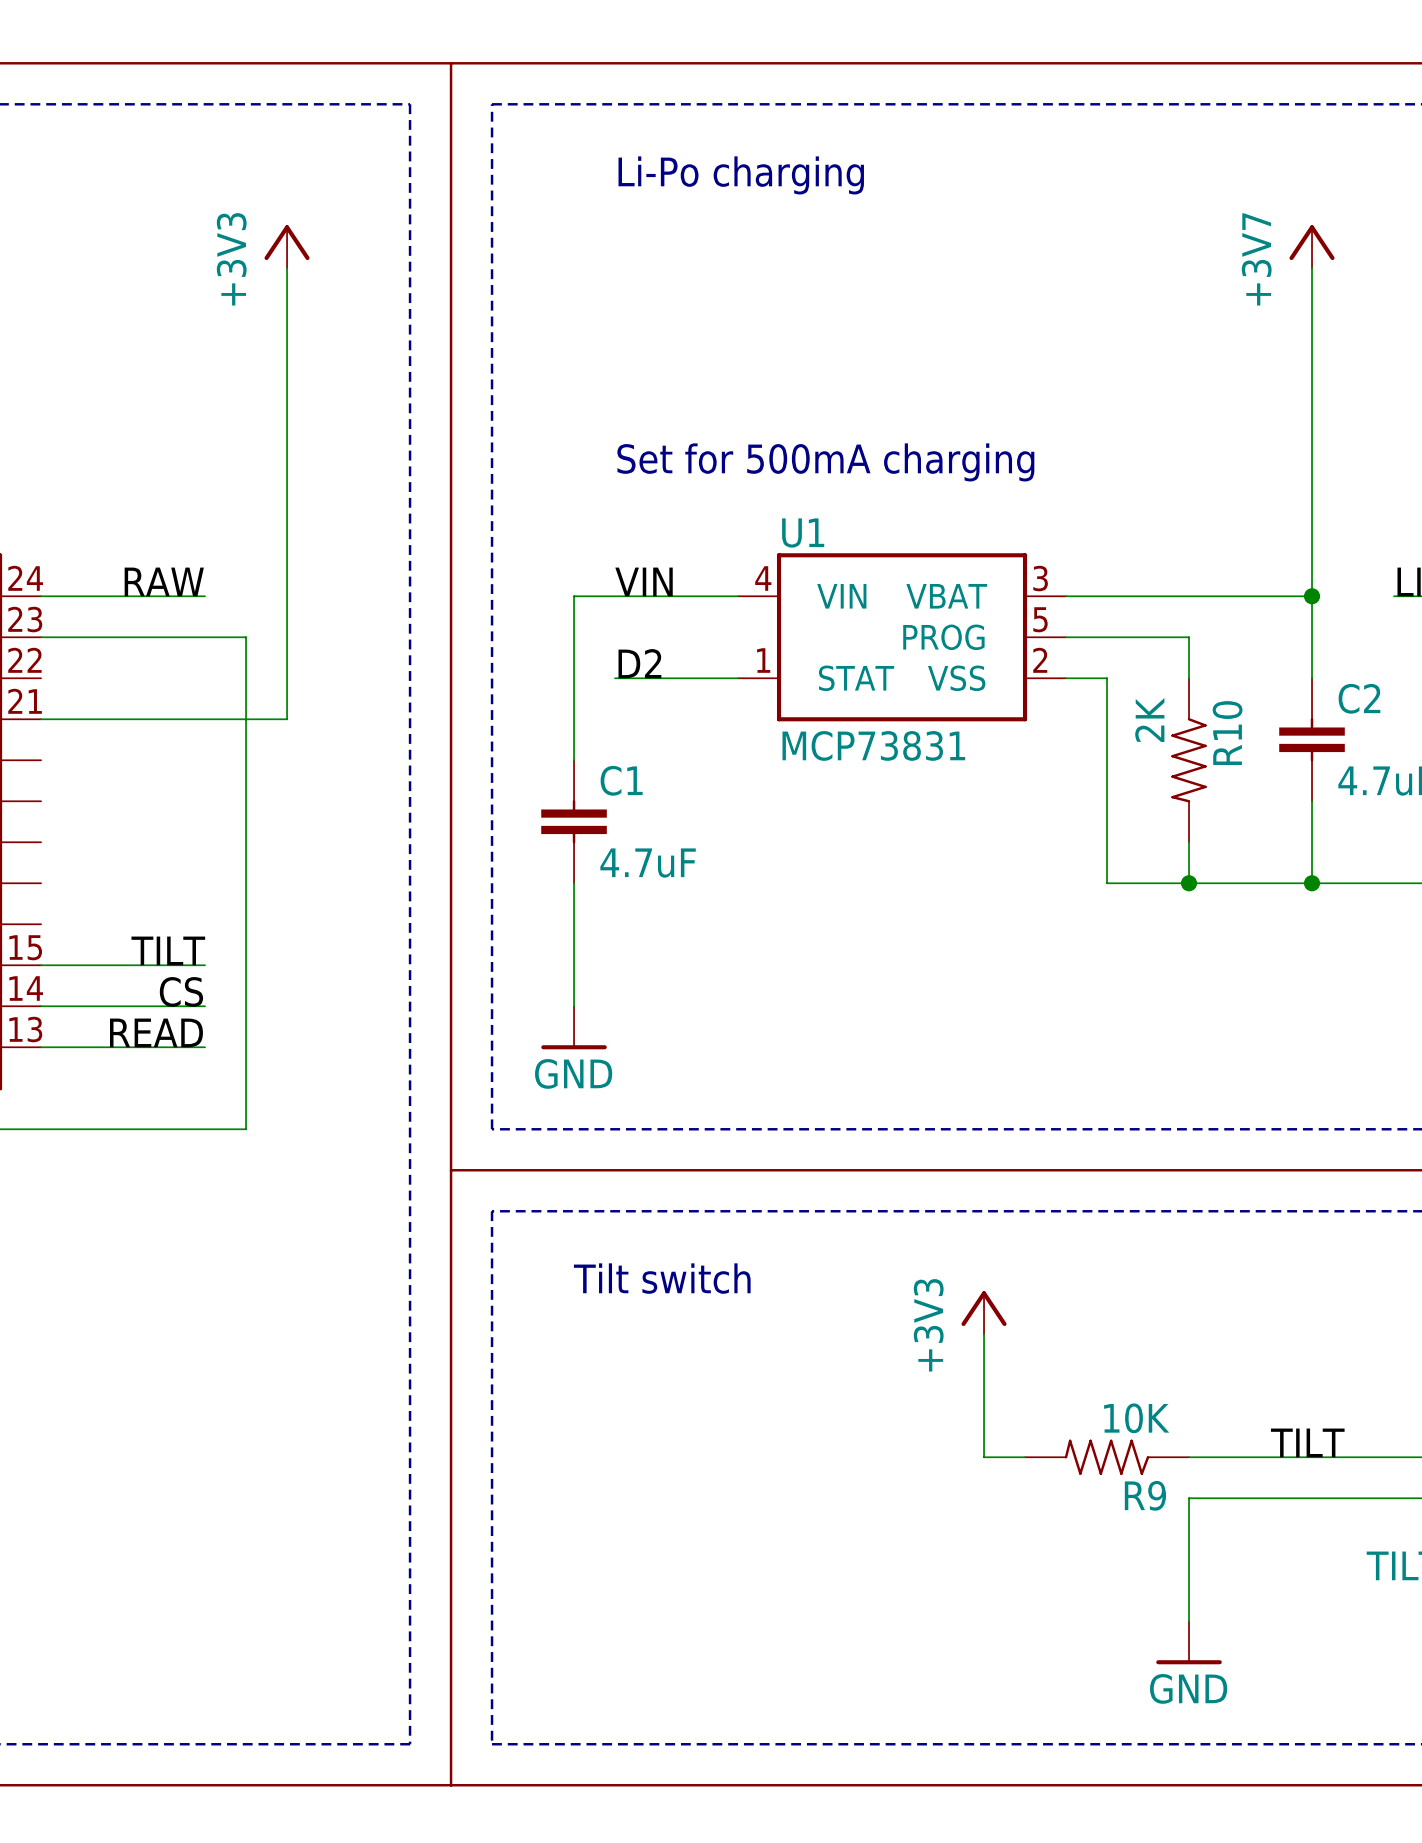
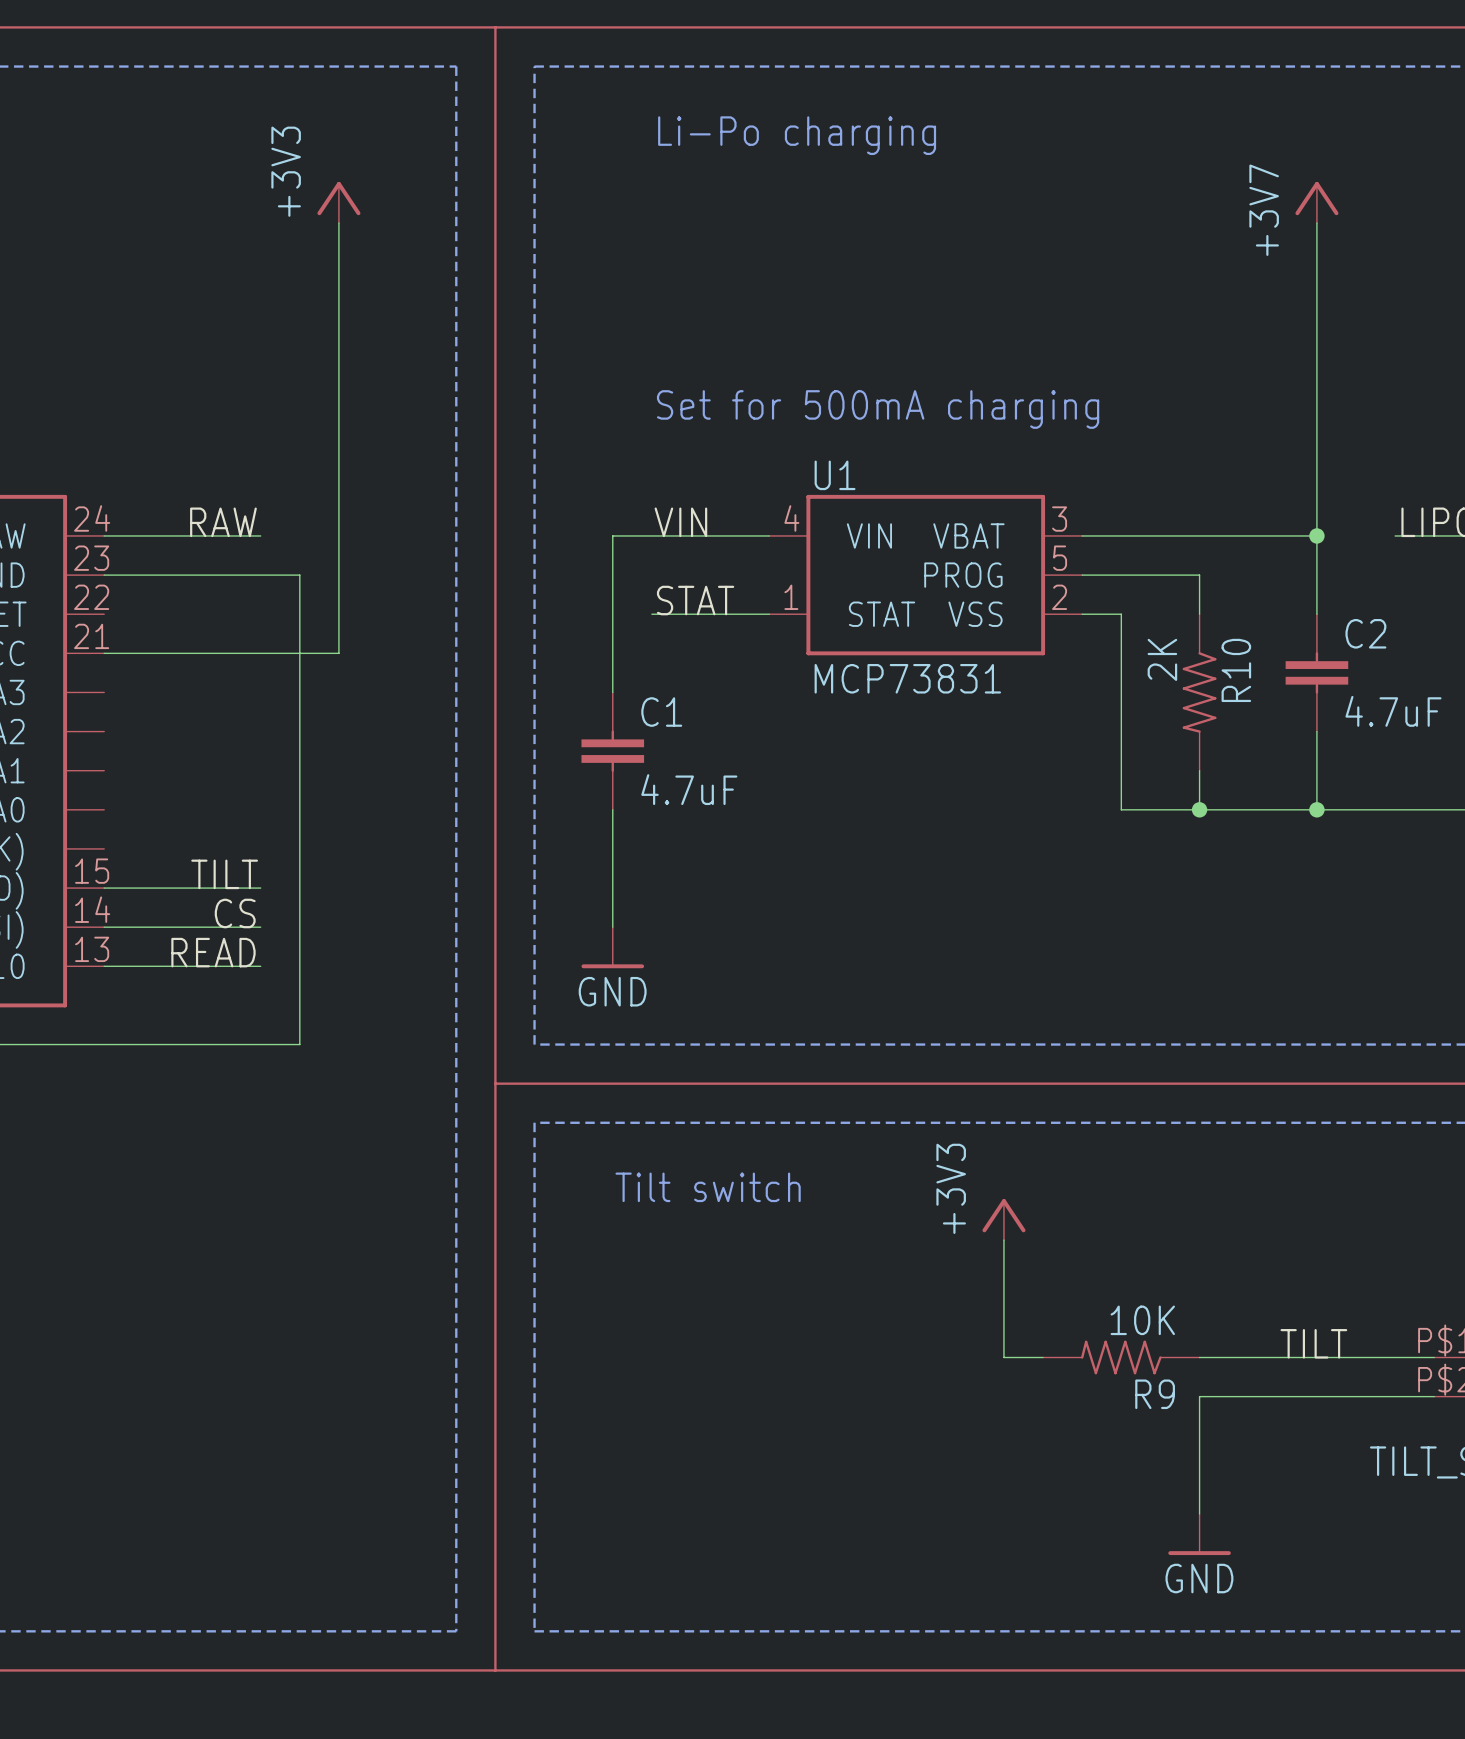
power symbol text position: +3V3 (231, 259) -> +3V3 (286, 171)
label: D2 (639, 663) -> STAT (695, 600)
power symbol text position: +3V3 (928, 1325) -> +3V3 (951, 1188)

